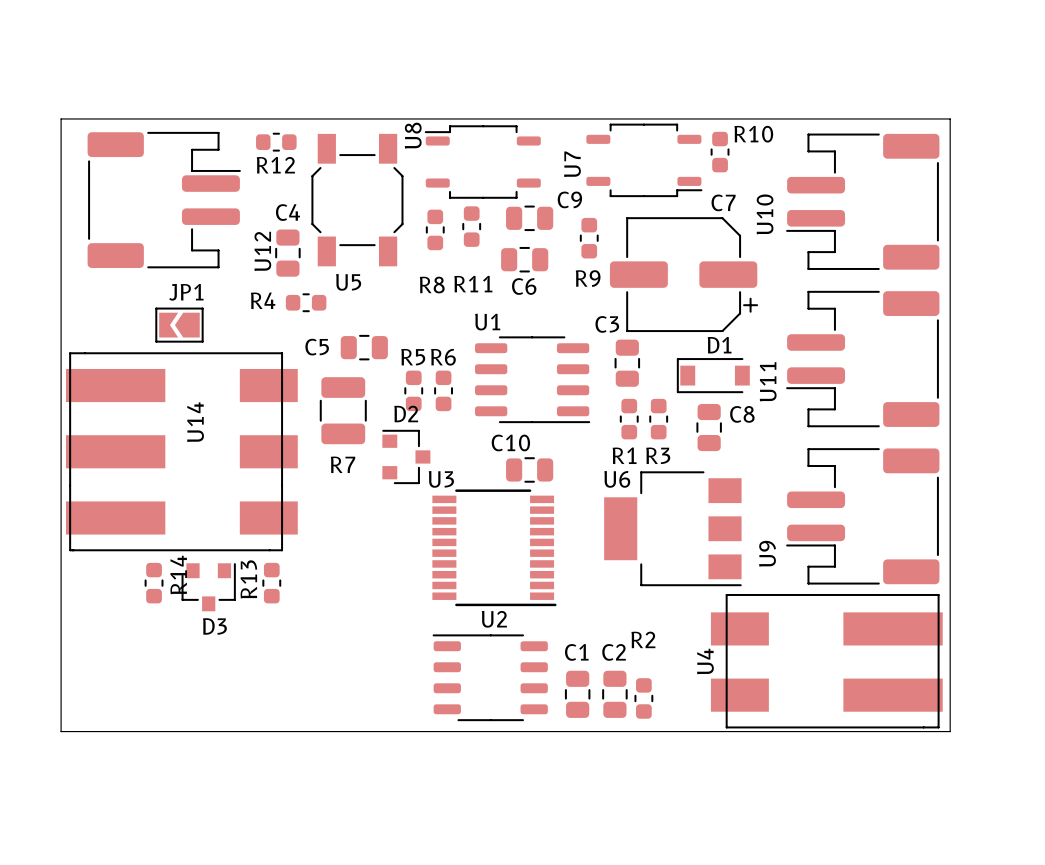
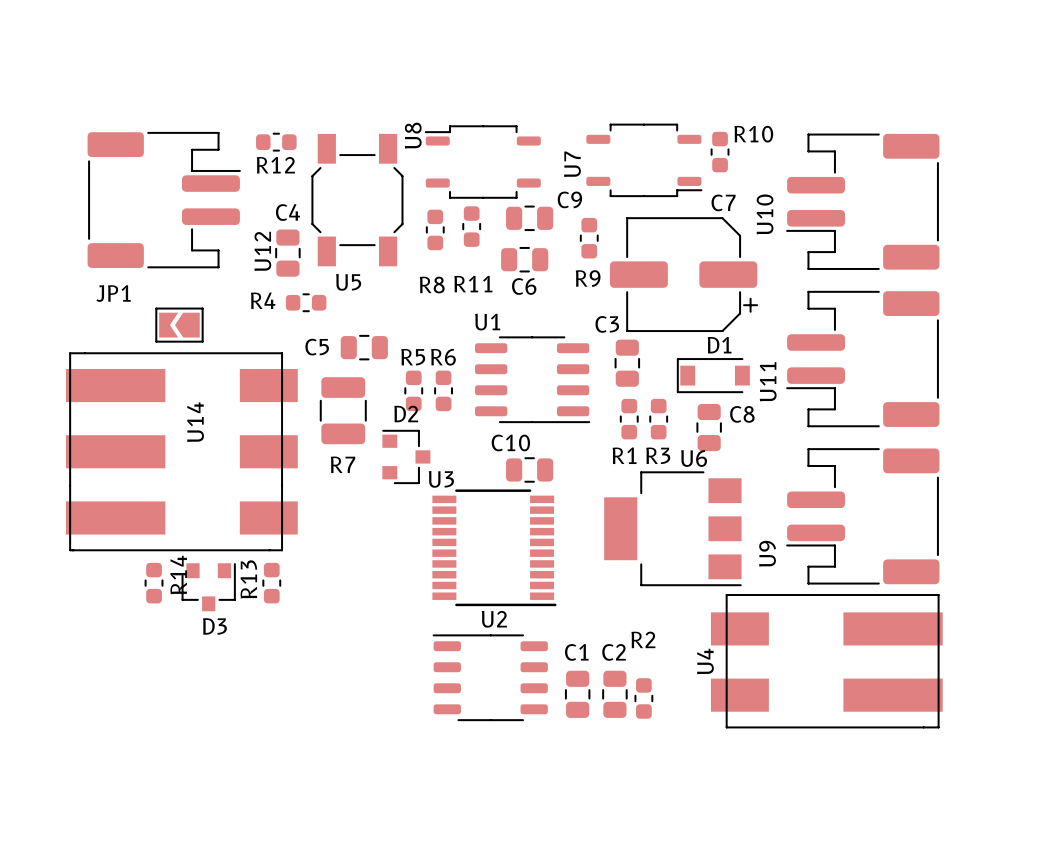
board edge: (61, 118) (950, 118) (950, 731) (61, 731) (61, 118) -> none
JP1 name position: JP1 (186, 292) -> JP1 (113, 293)
U6 name position: U6 (617, 479) -> U6 (694, 458)

